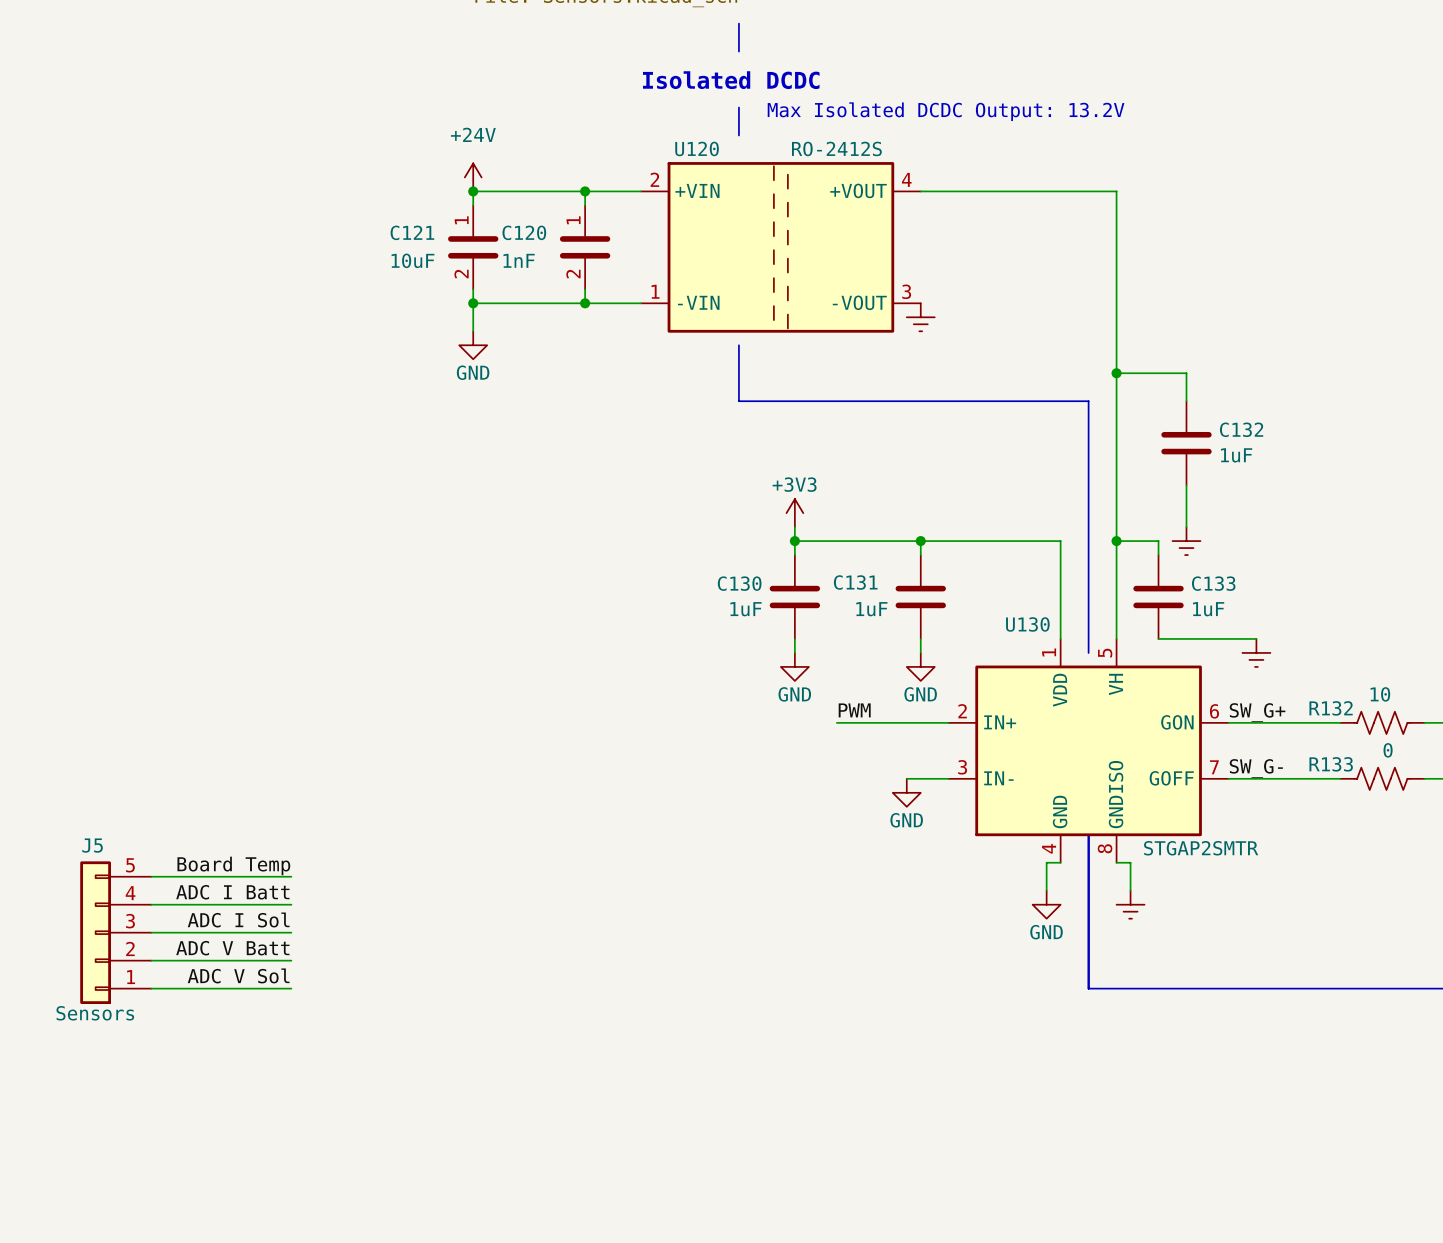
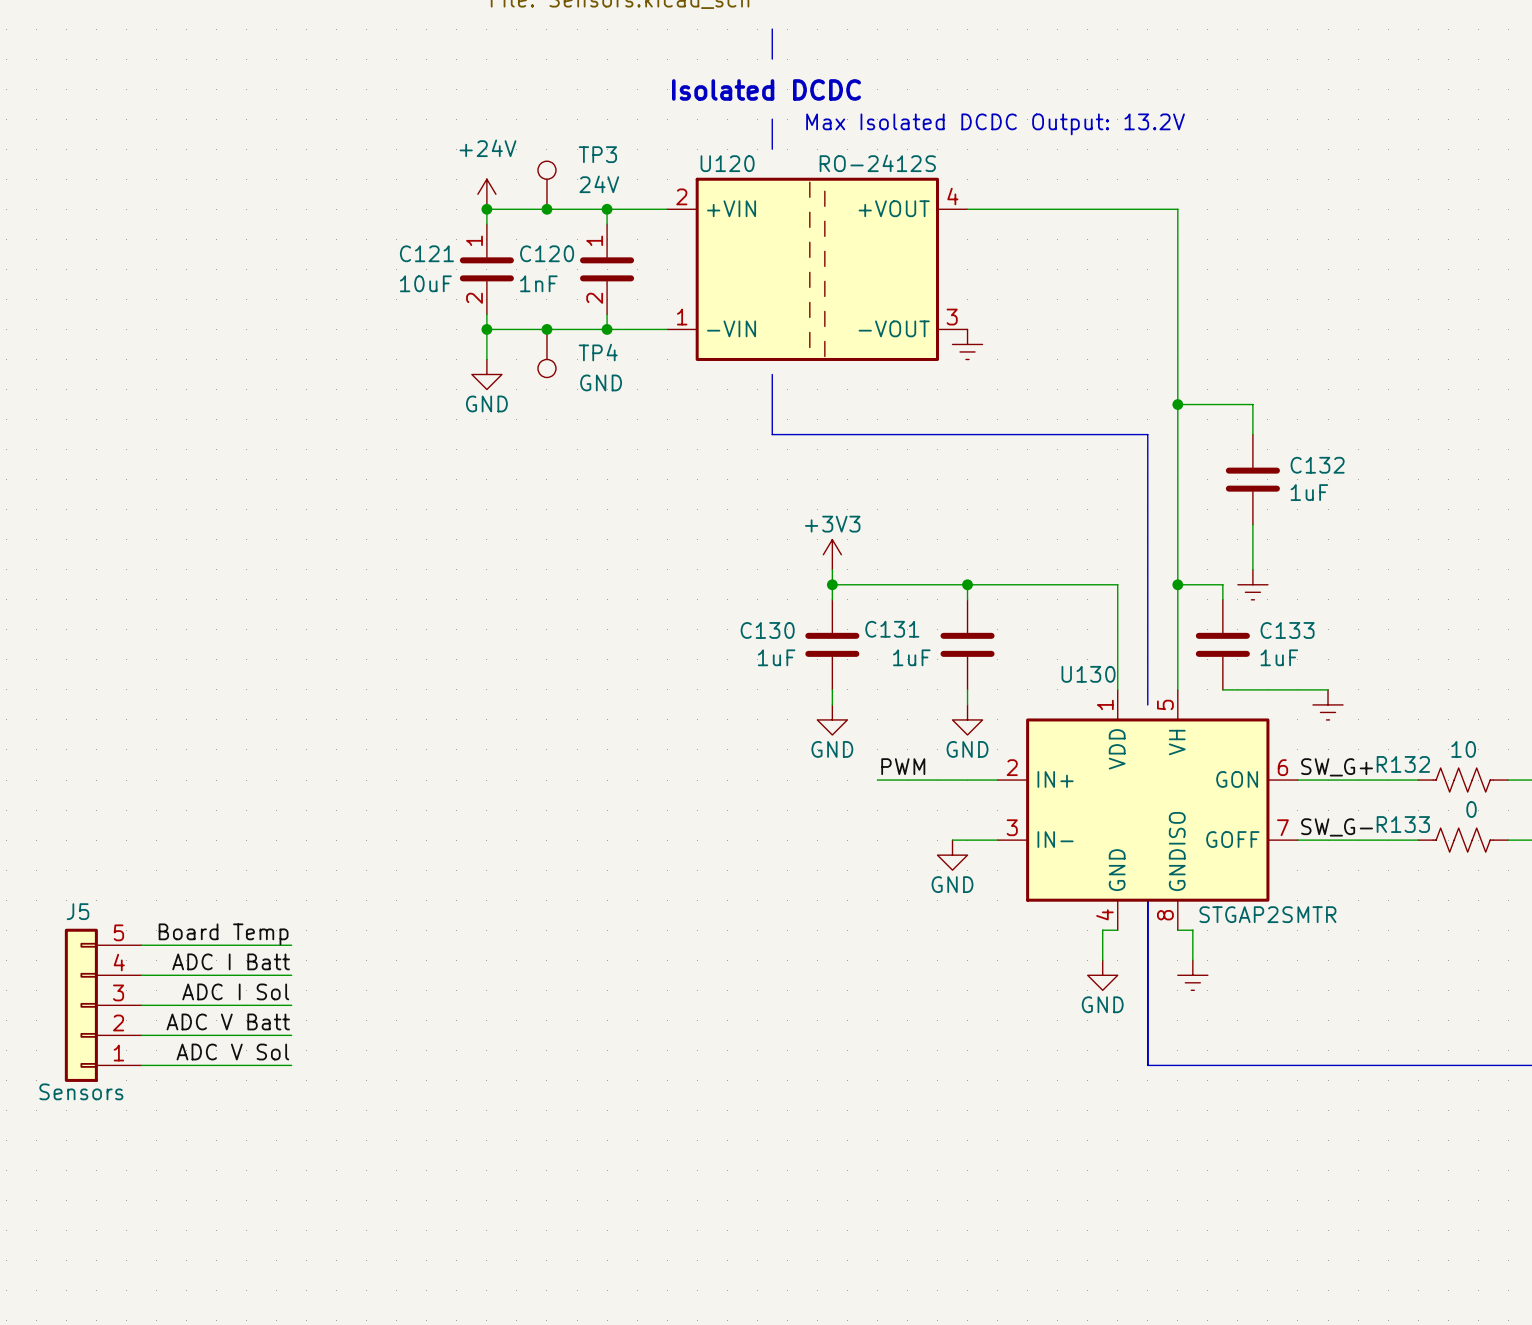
TP3: none -> 24V (546, 185)
junction: none -> (546, 209)
junction: none -> (546, 329)
TP4: none -> GND (546, 353)

